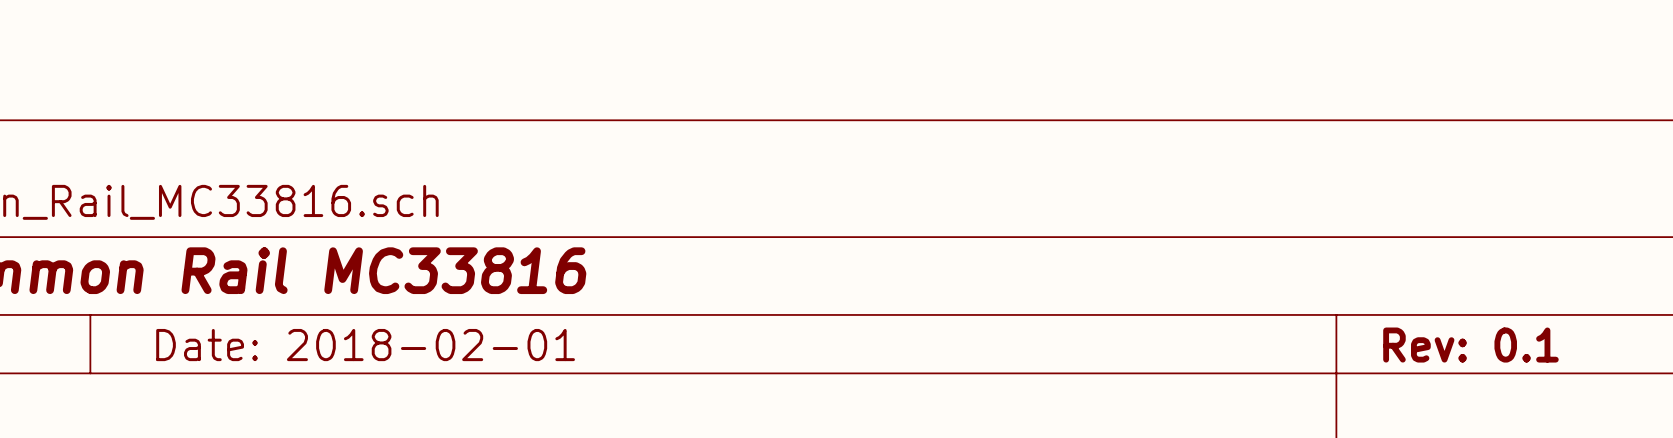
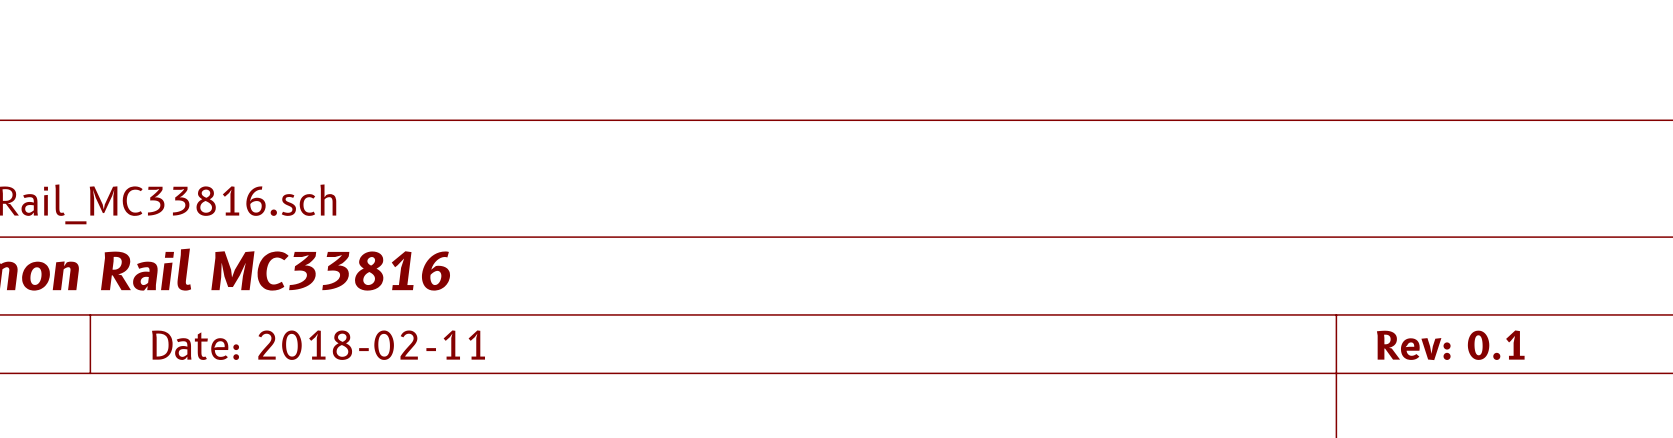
title block: Date: 2018-02-01 (365, 345) -> Date: 2018-02-11 (318, 345)

